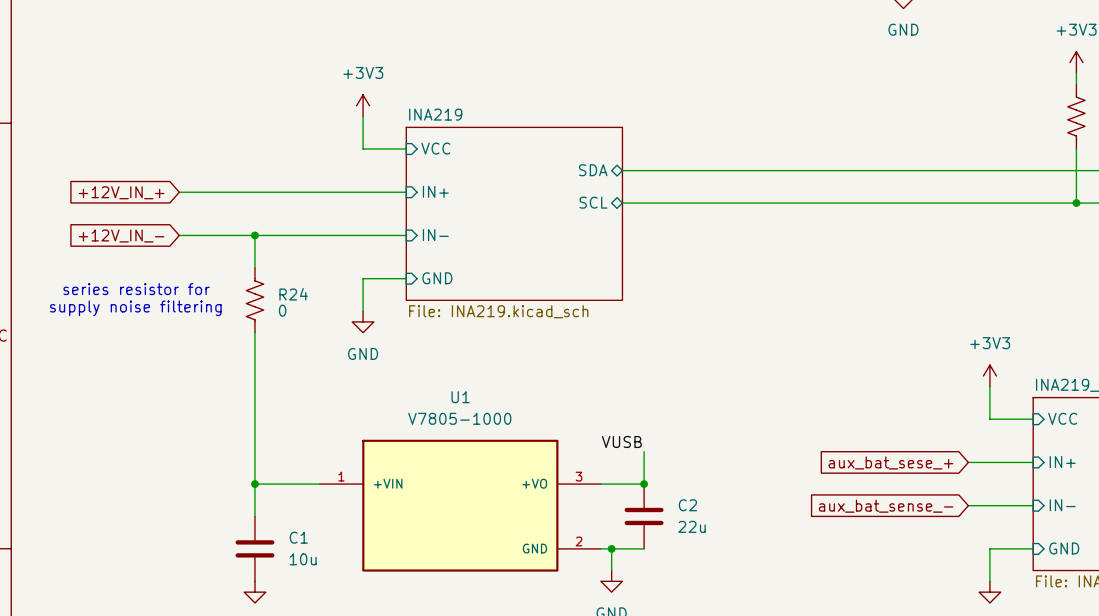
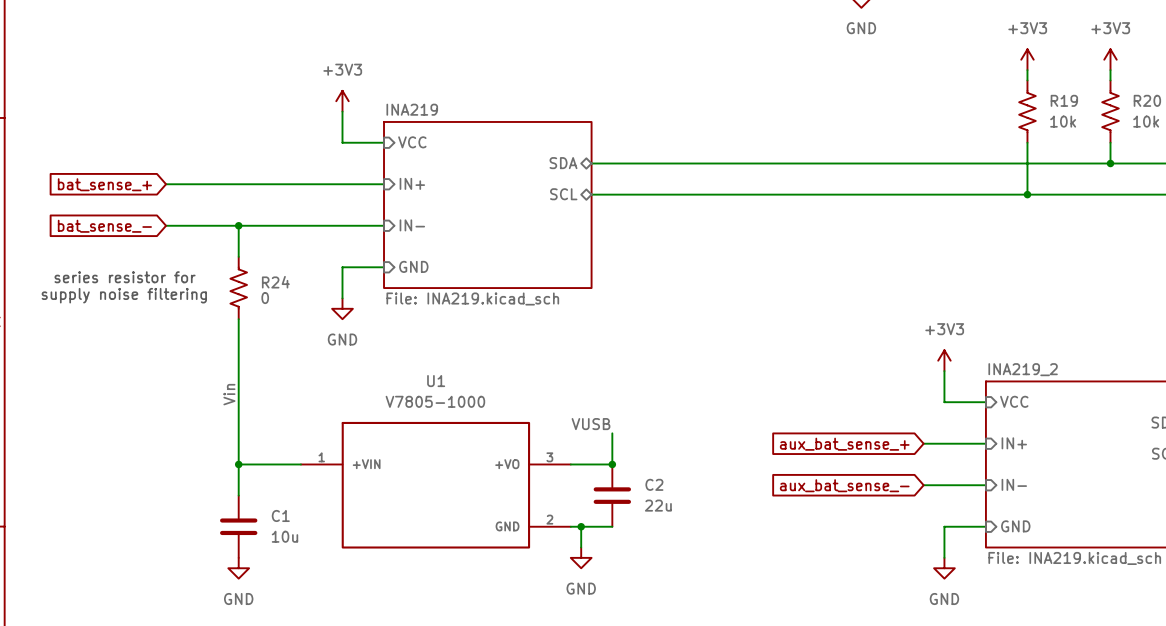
global label: +12V_IN_+ (121, 192) -> bat_sense_+ (104, 184)
global label: +12V_IN_- (121, 235) -> bat_sense_- (104, 226)
label: none -> Vin (229, 394)
global label: aux_bat_sese_+ (890, 462) -> aux_bat_sense_+ (844, 444)

